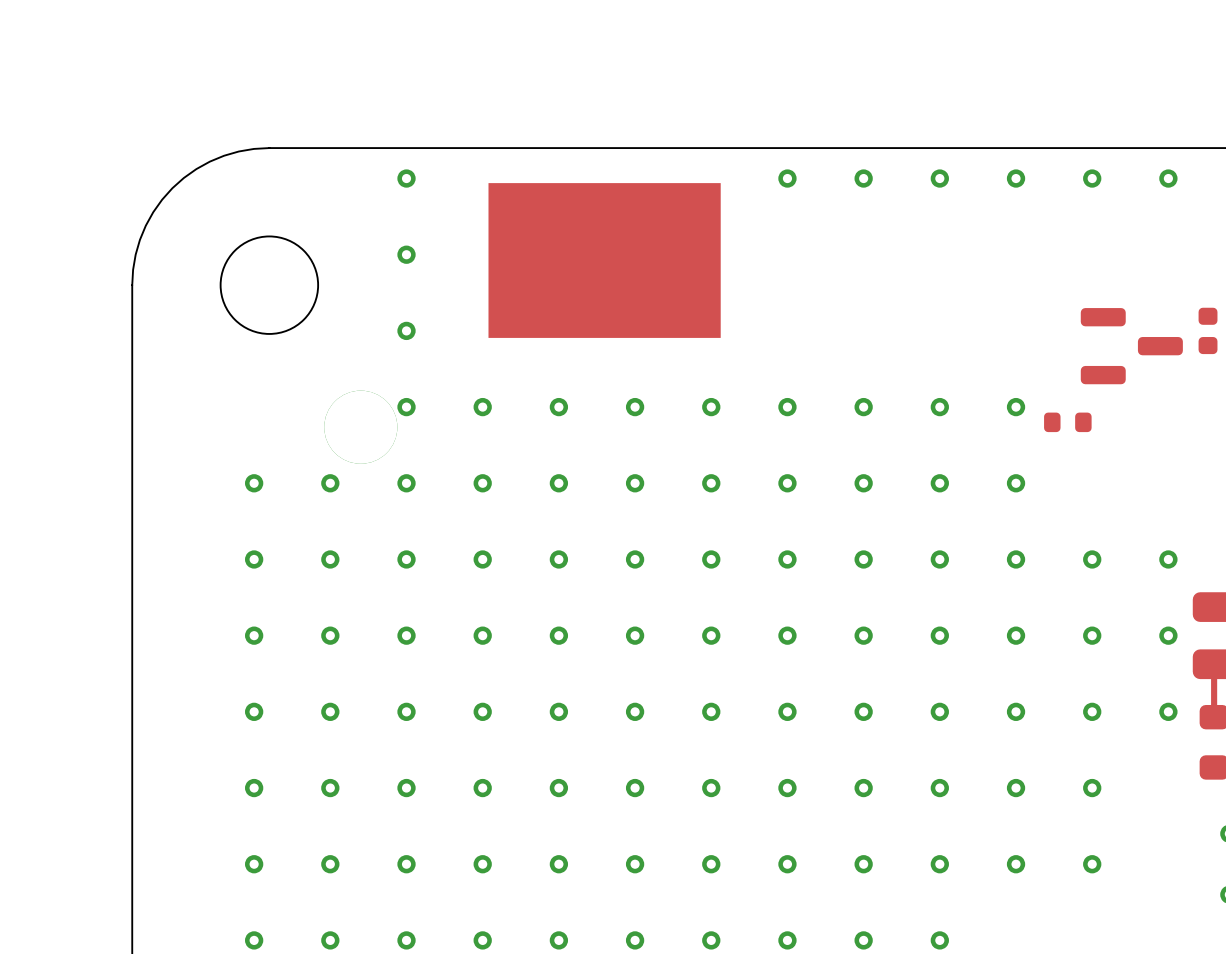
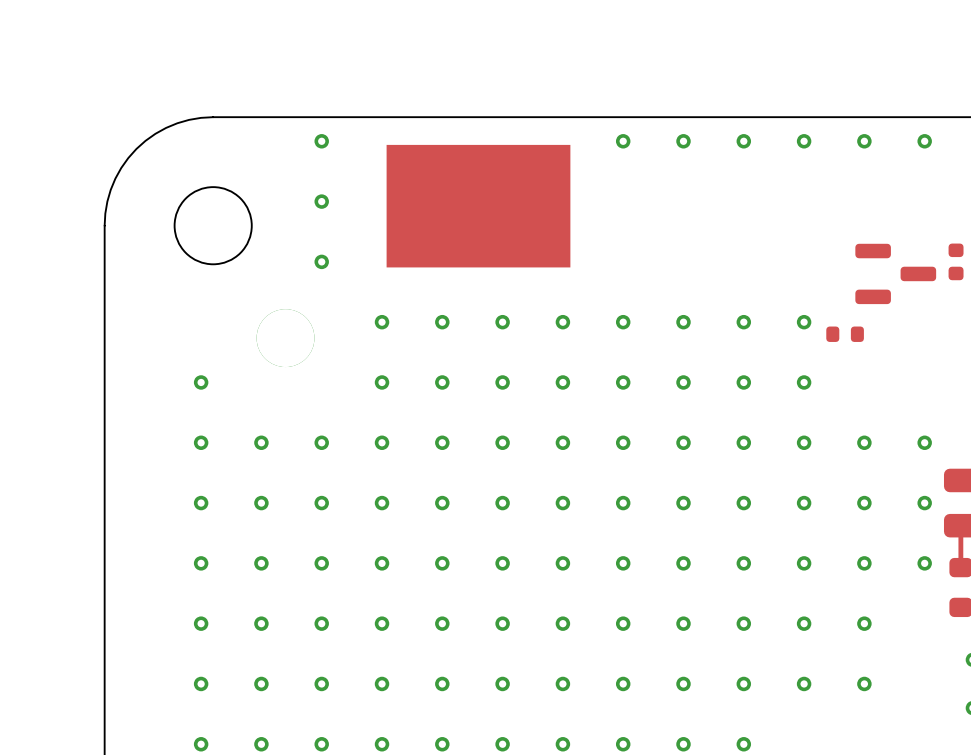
via: (406, 407) -> none
via: (330, 483) -> none
via: (406, 483) -> none

